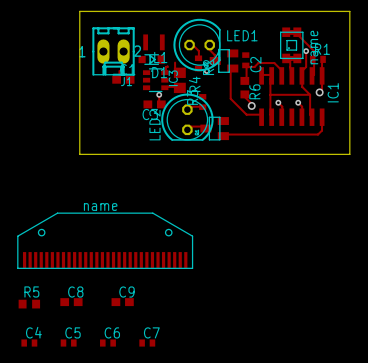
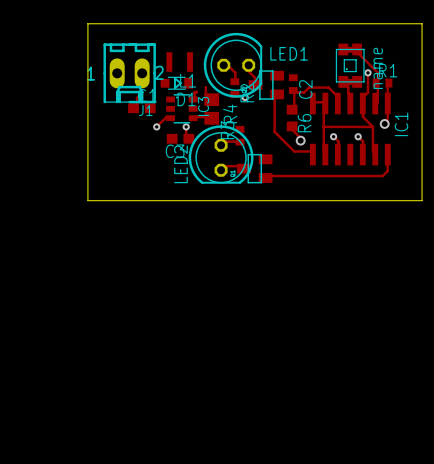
track: none -> (170, 118) (166, 117) (156, 126)
via: none -> (156, 126)
part: (105, 240) -> none
C8: (71, 302) -> none
C9: (122, 302) -> none
R5: (29, 304) -> none
C4: (29, 343) -> none
C5: (68, 343) -> none
C6: (107, 343) -> none
C7: (147, 343) -> none

